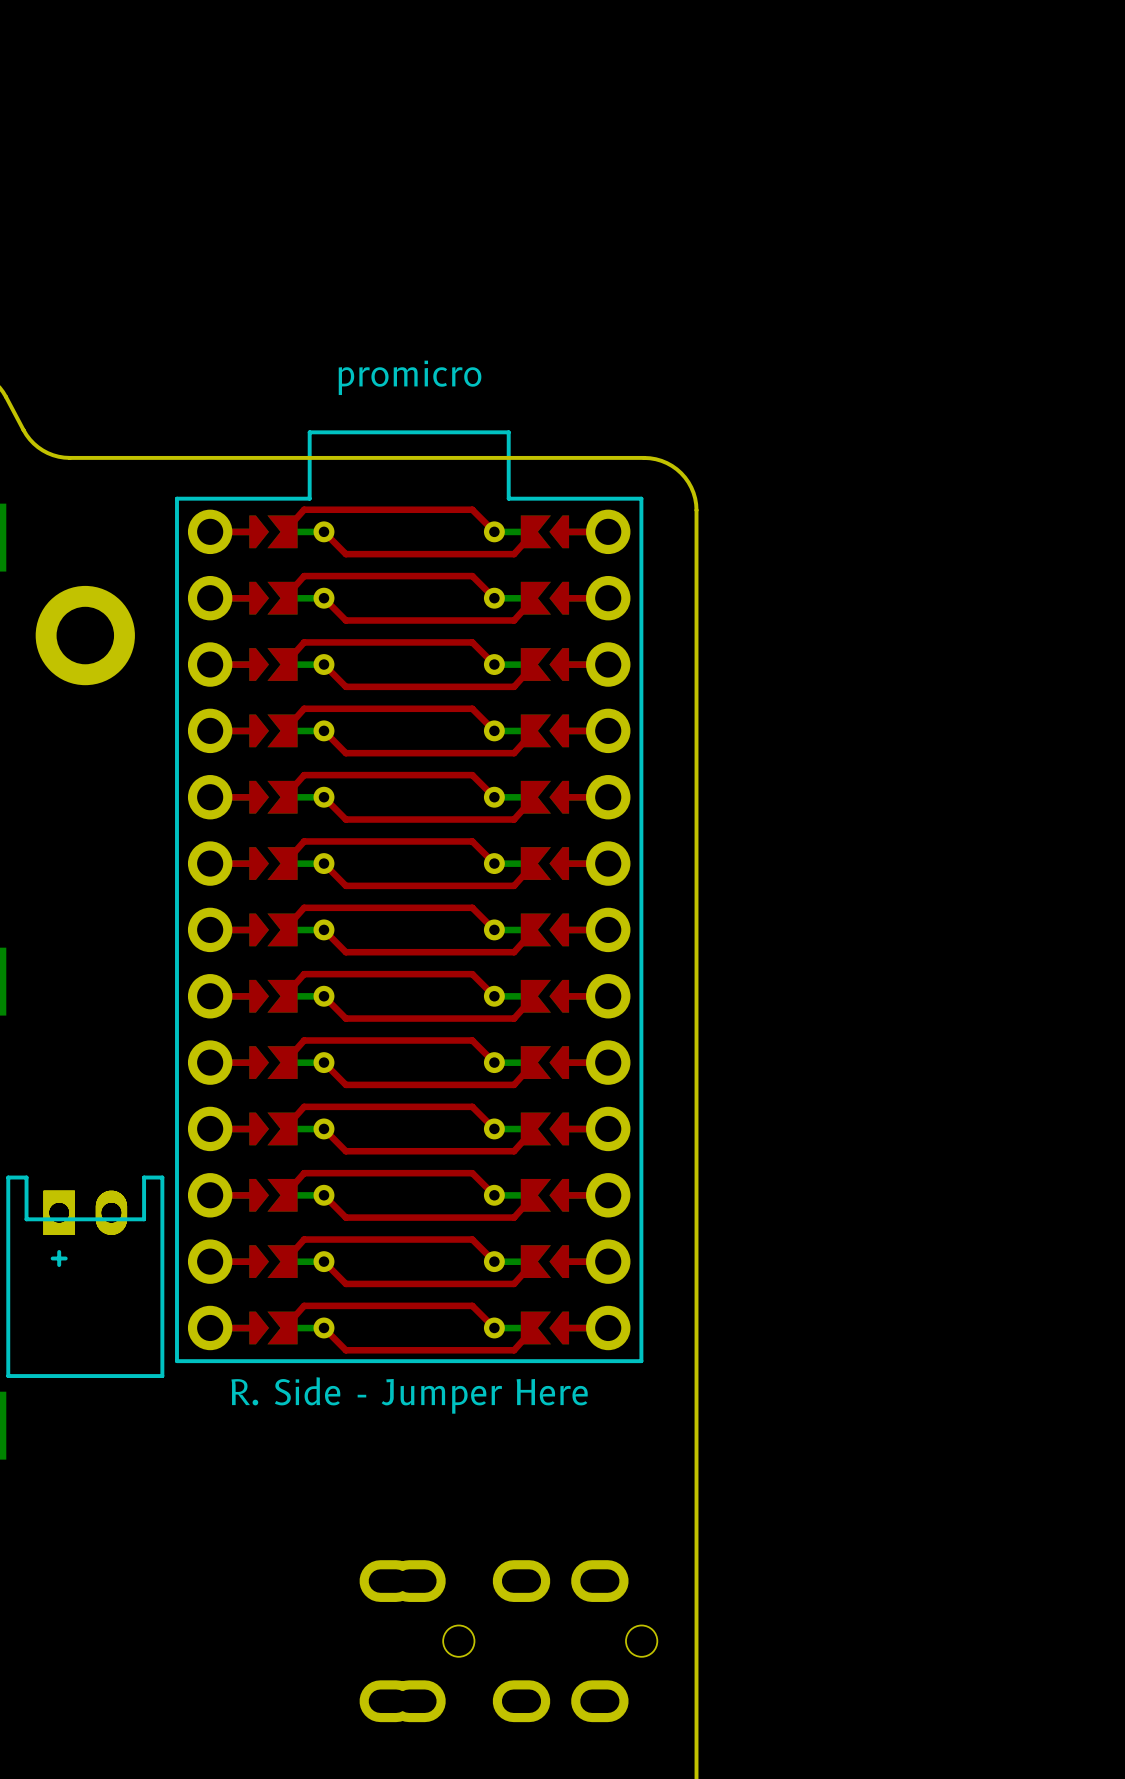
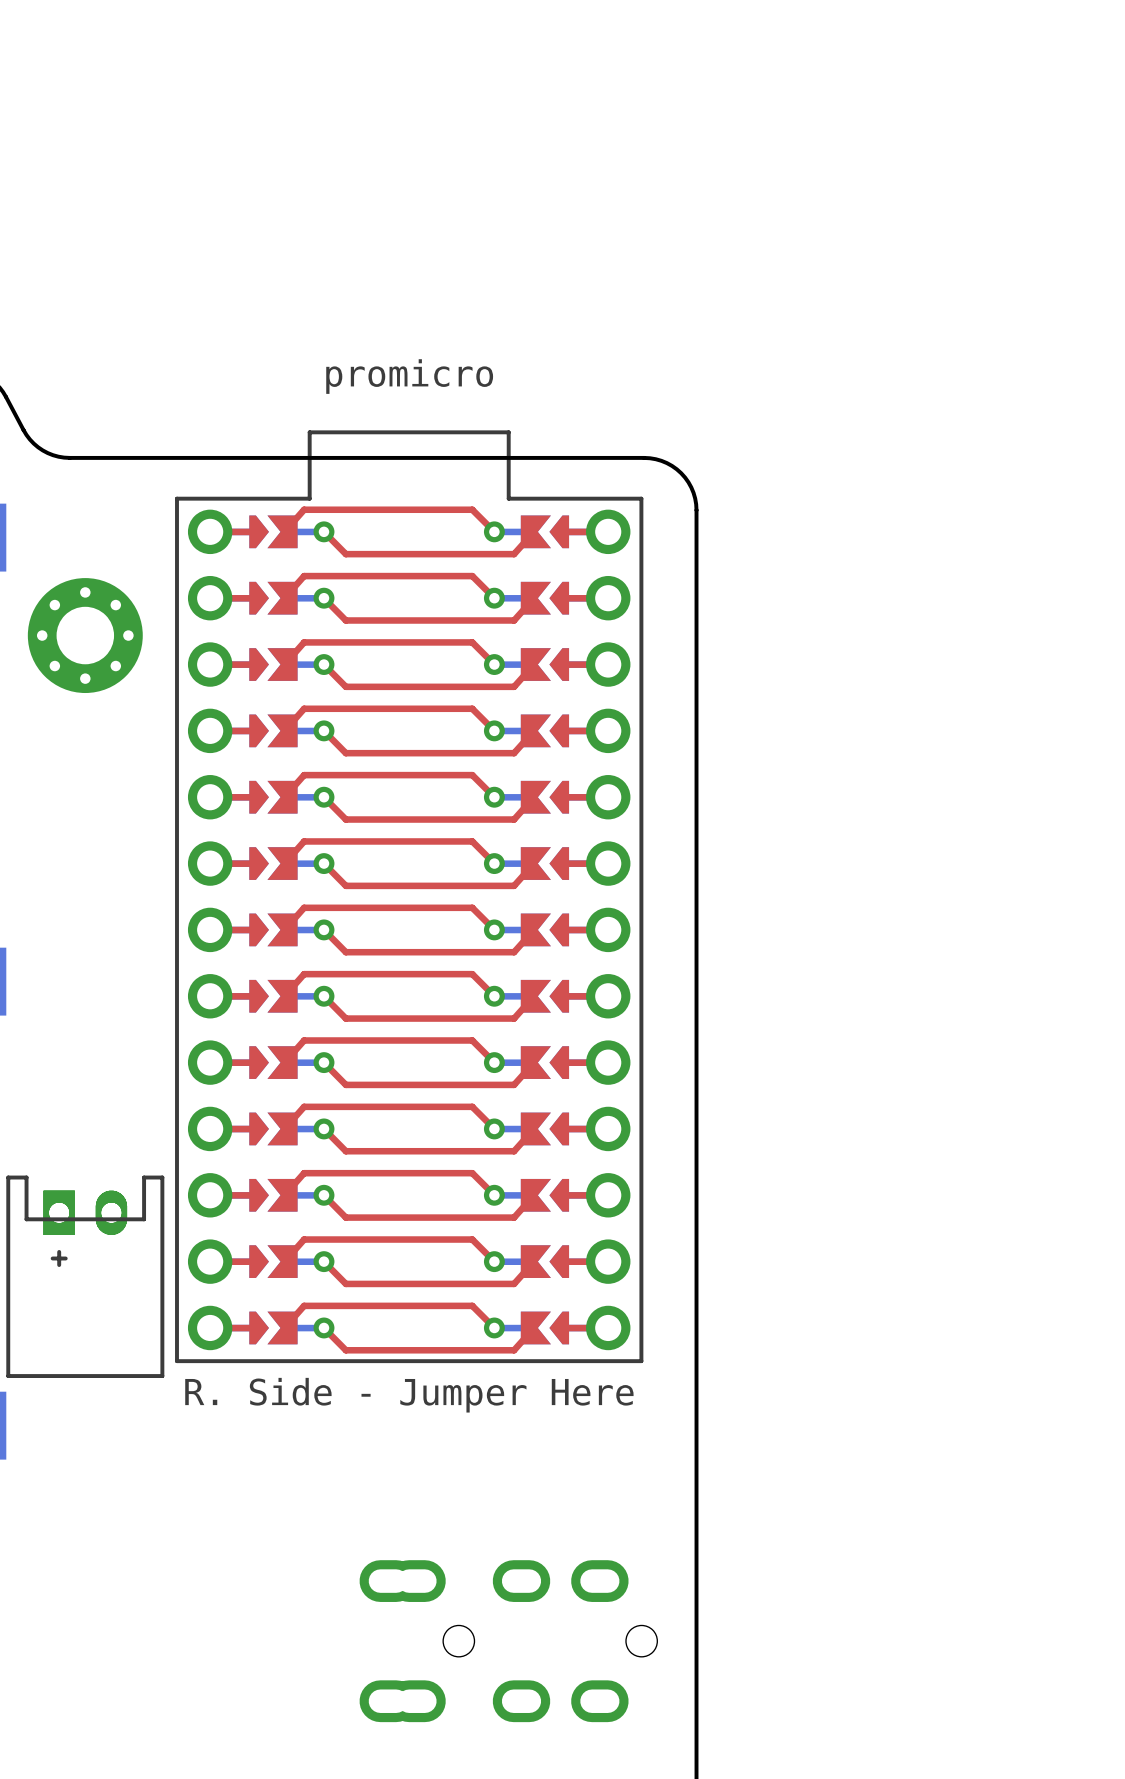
part footprint: [35, 585, 135, 686] -> [27, 578, 143, 694]

